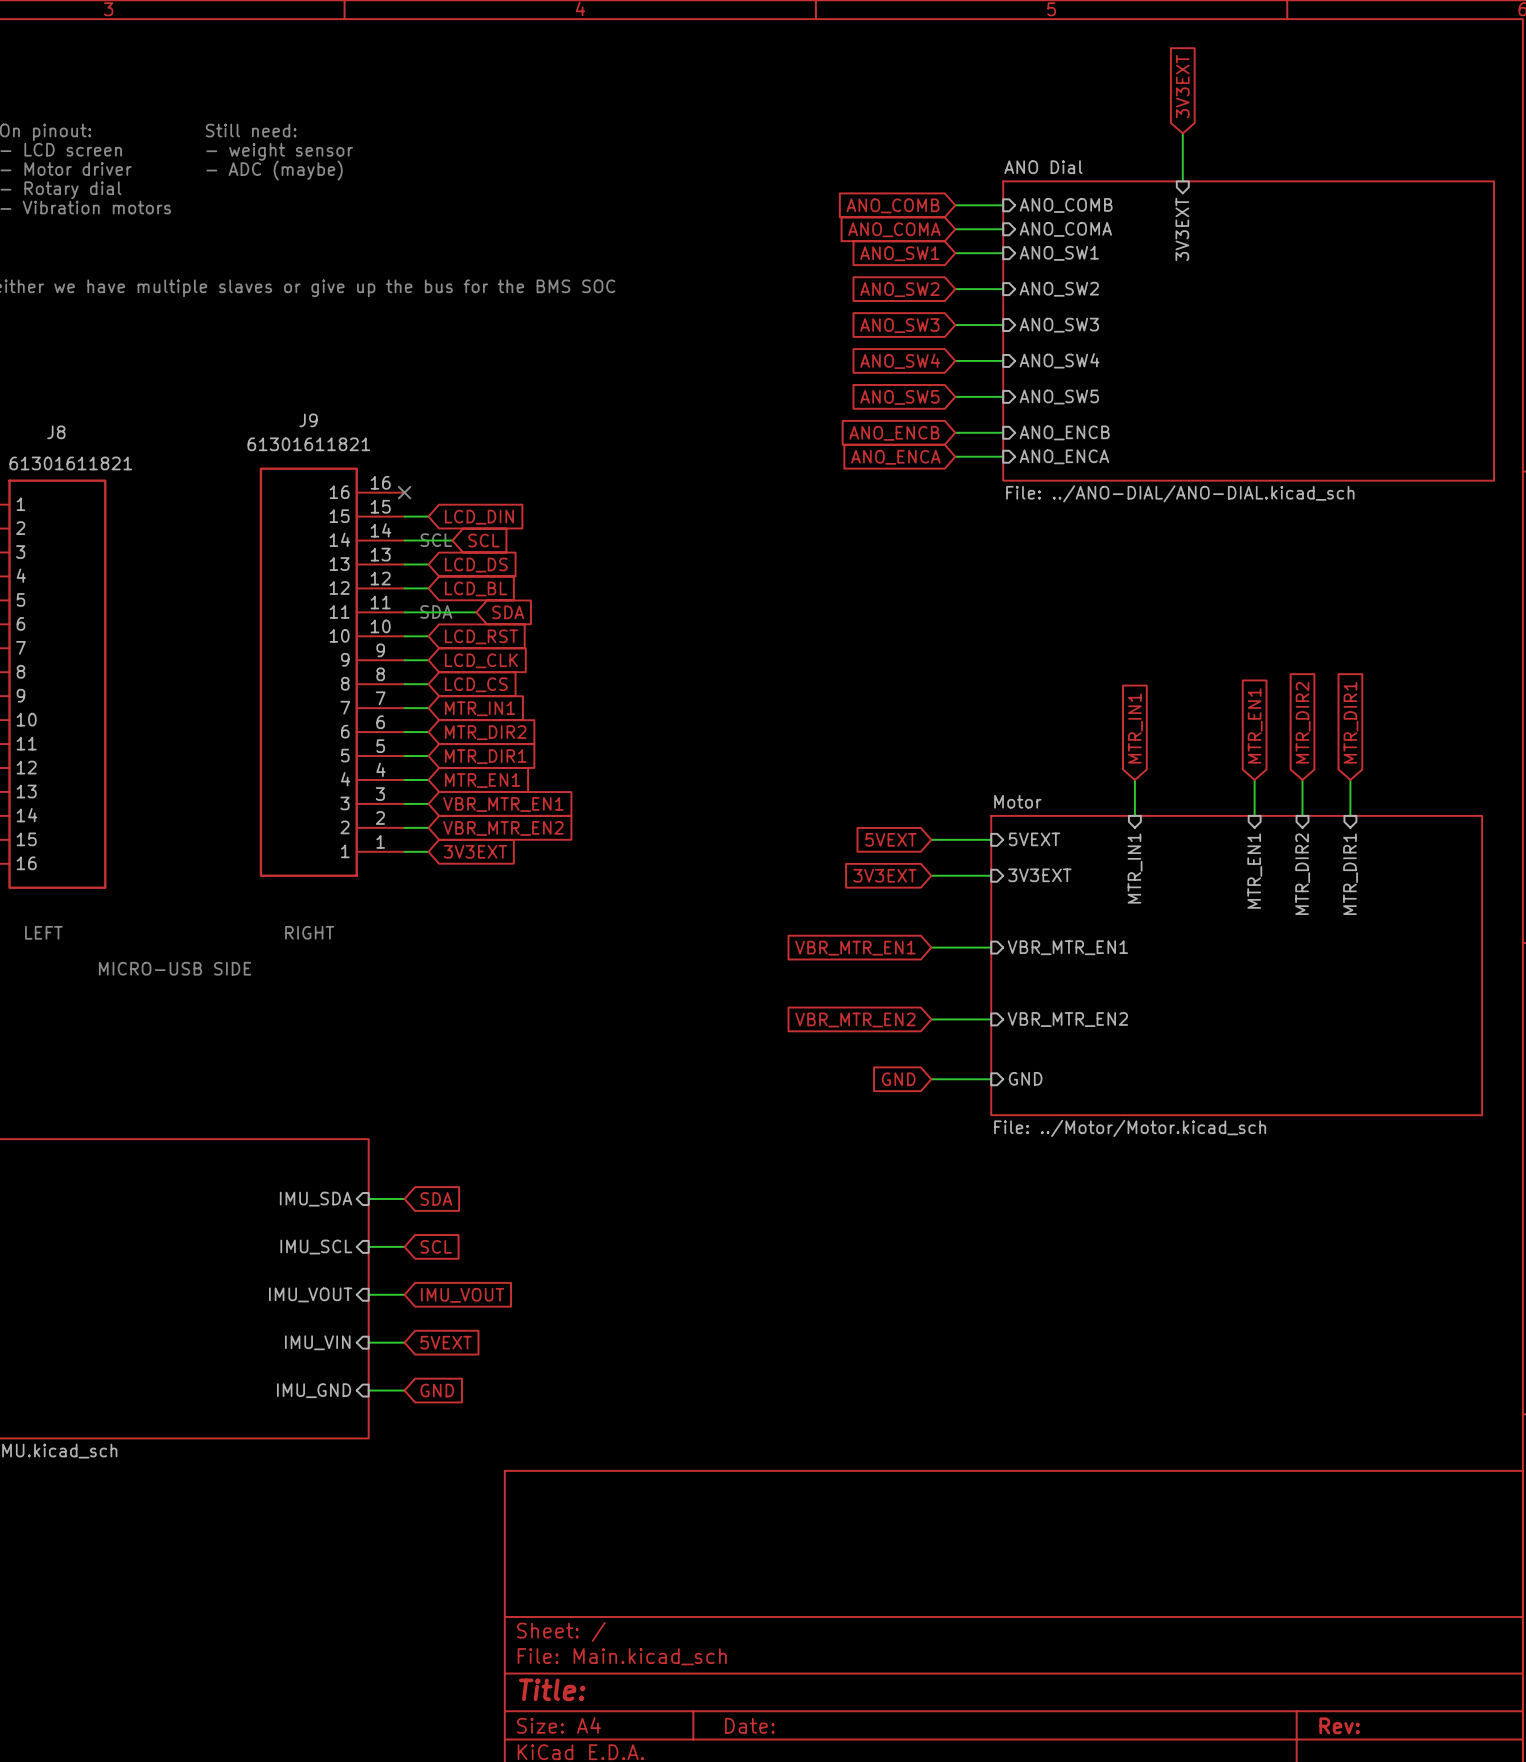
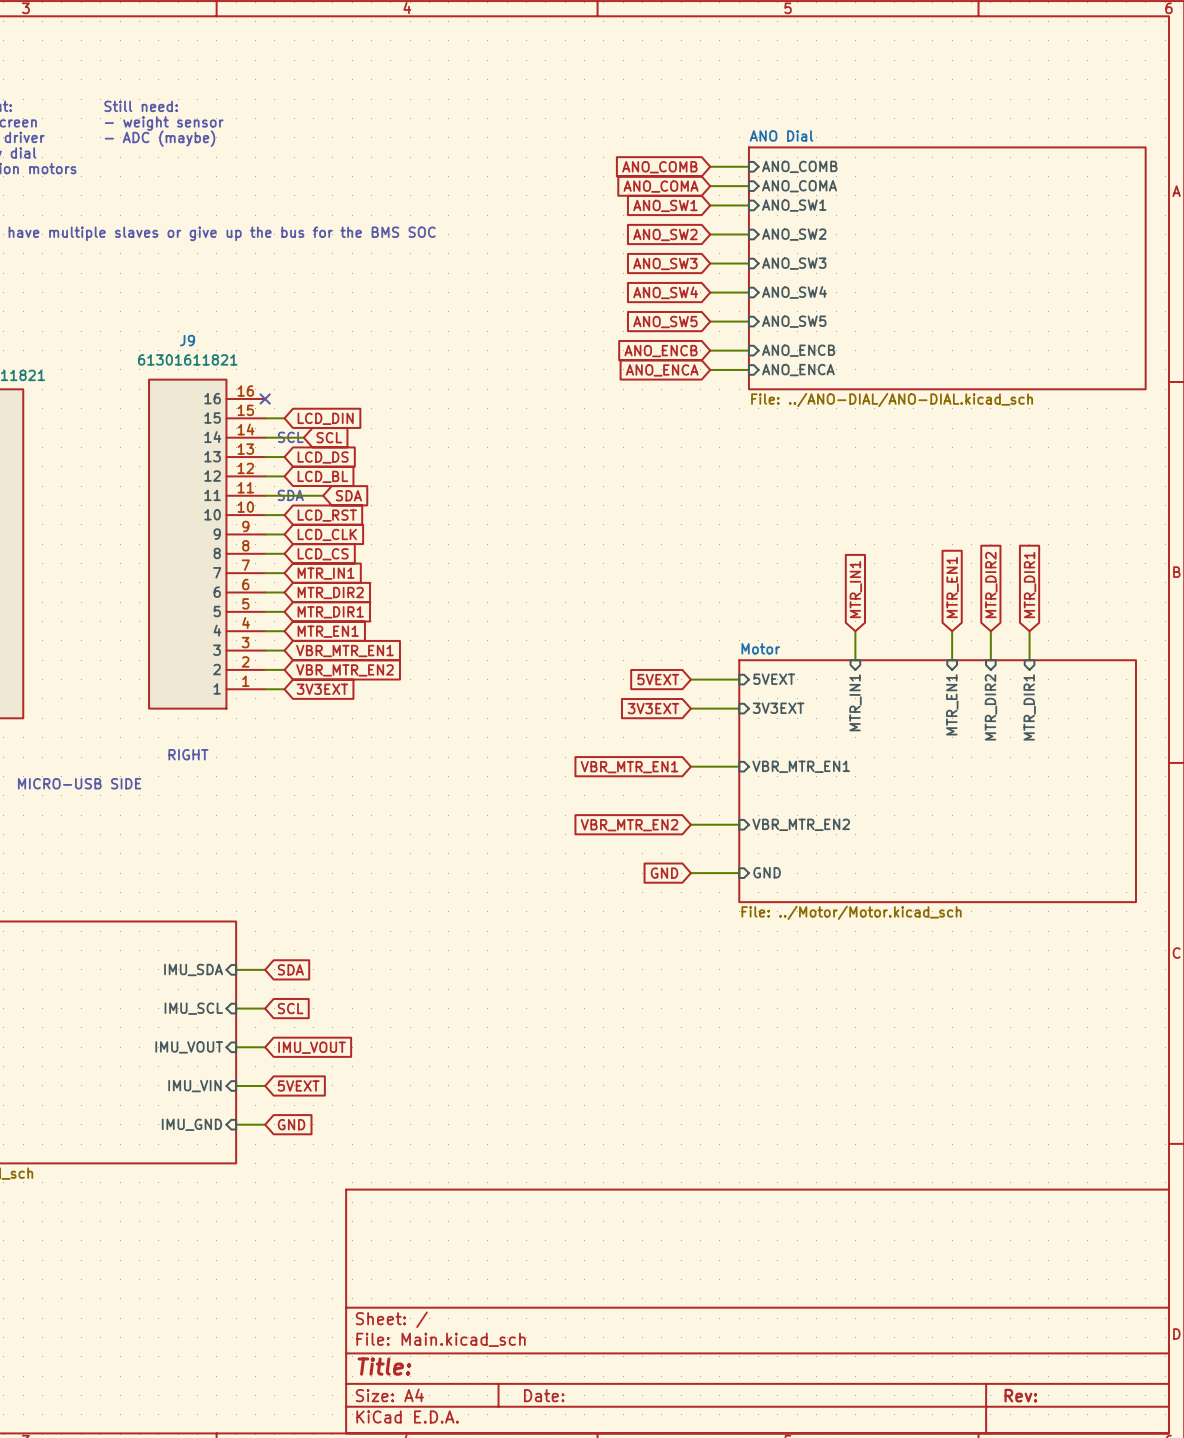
global label: 3V3EXT (1182, 86) -> none
wire: (1182, 133) (1182, 181) -> none
sheet pin: 3V3EXT (1182, 229) -> none

